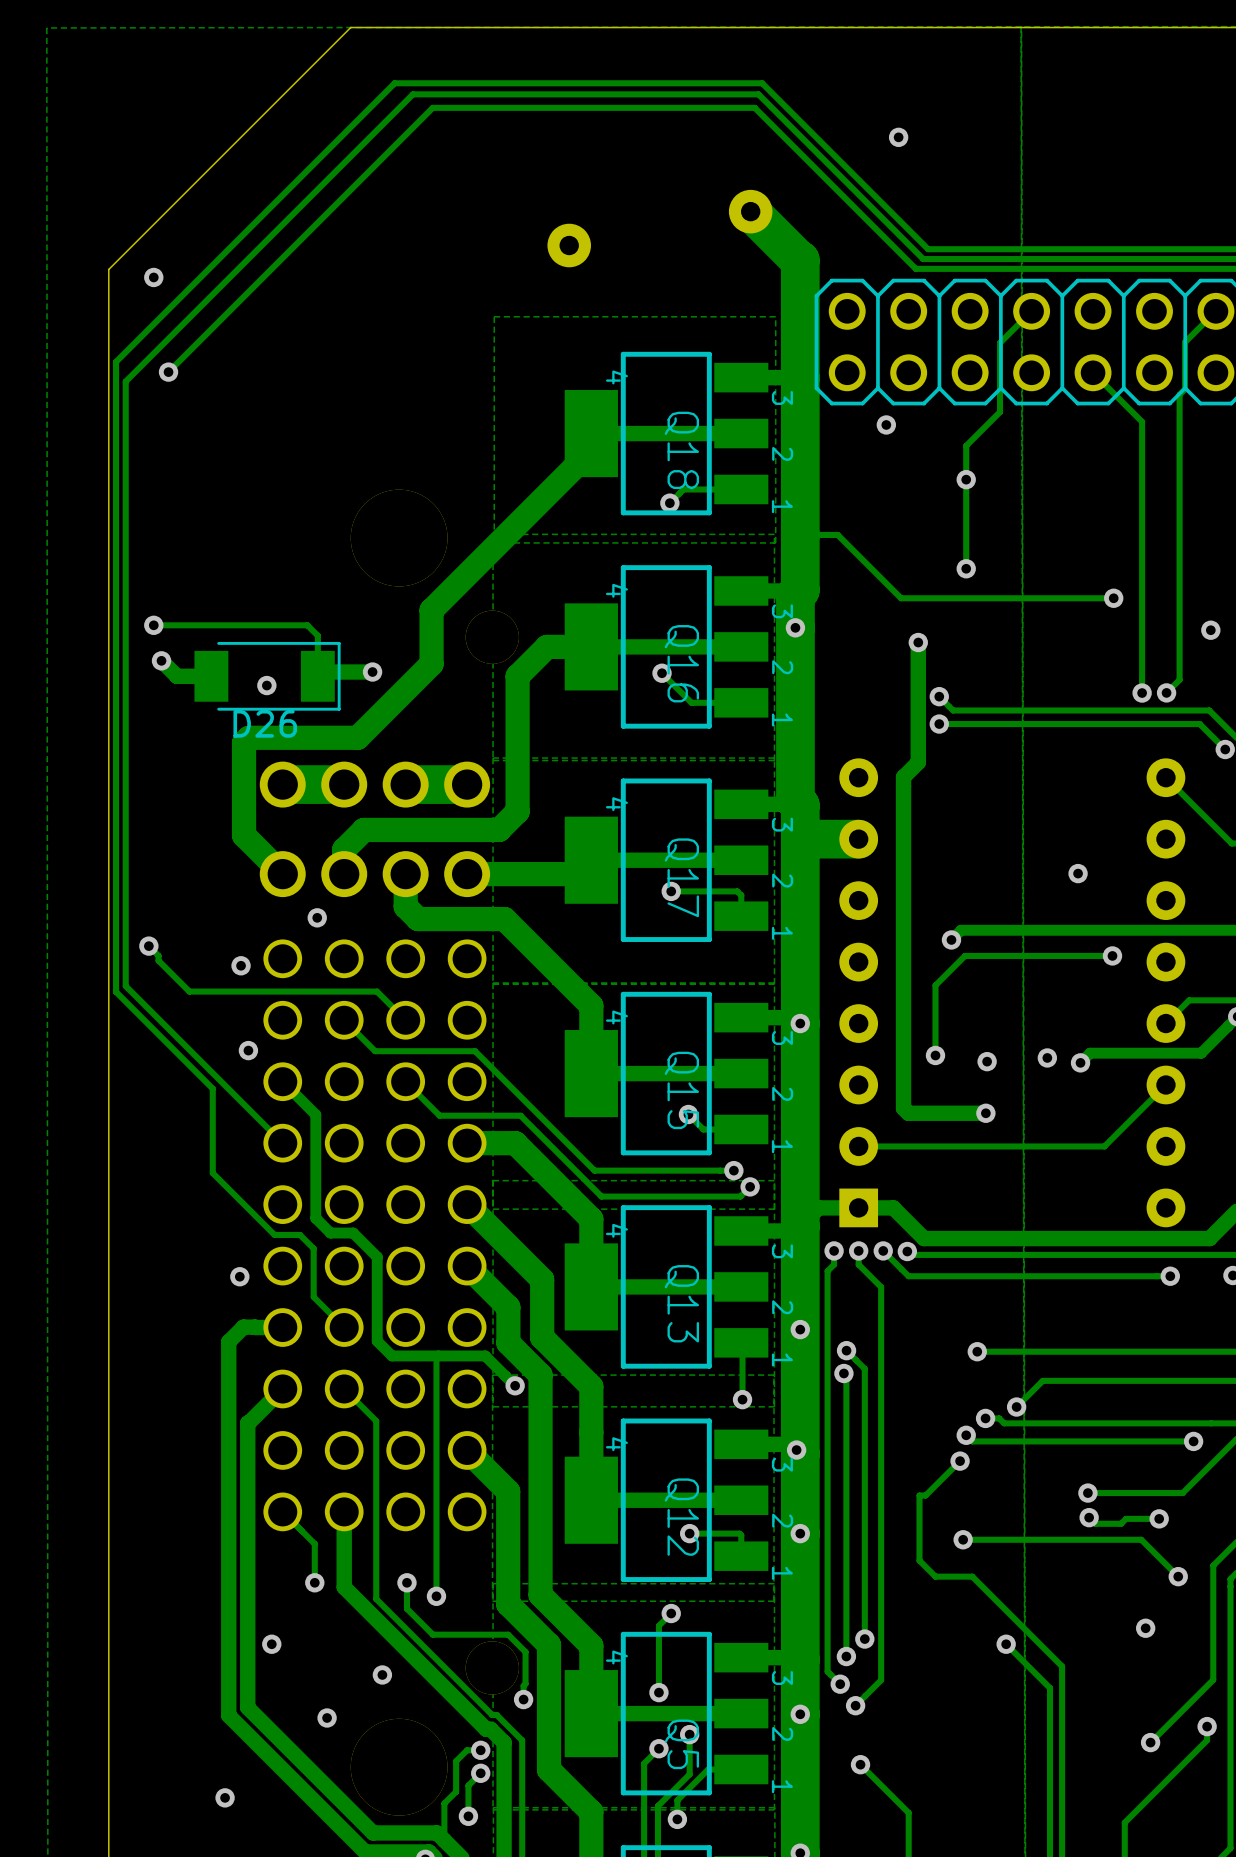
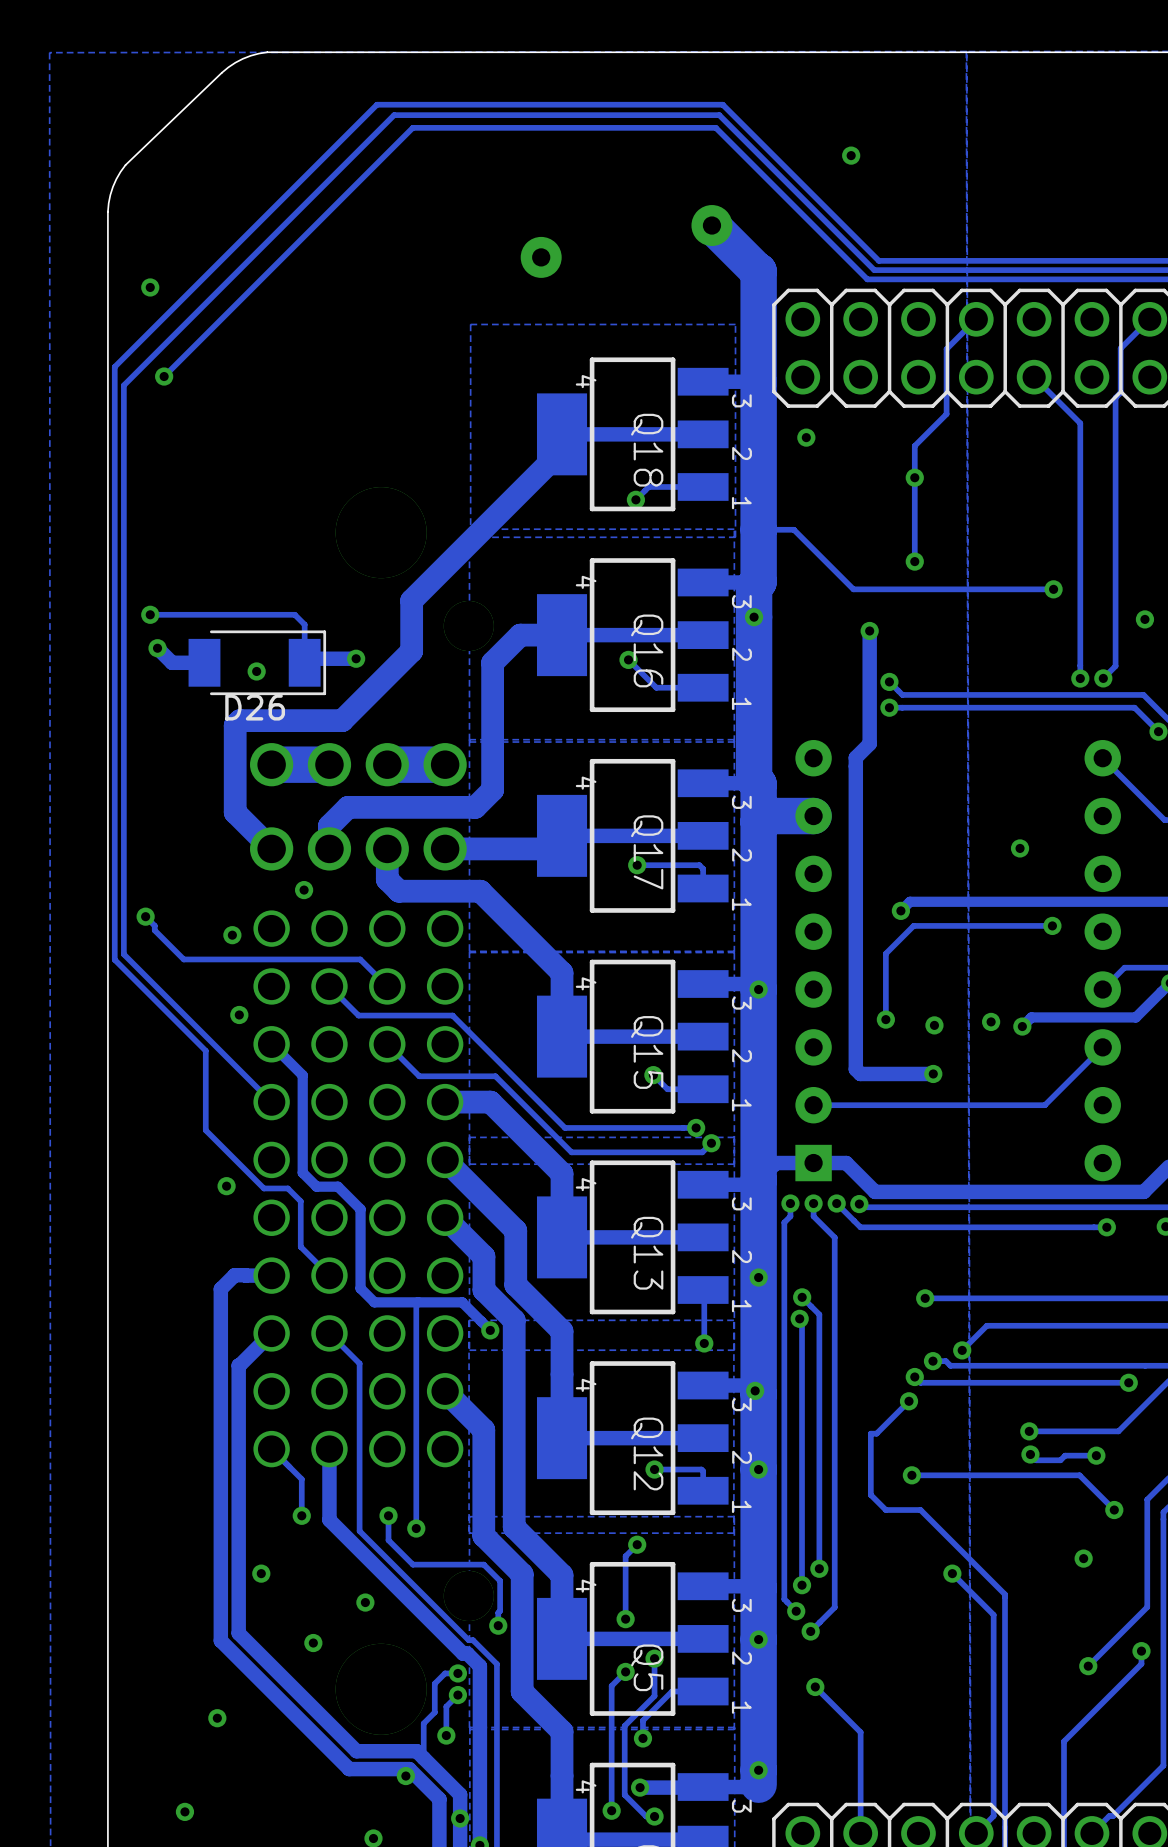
board edge: (350, 27) (108, 269) -> (335, 52) (267, 52) (250, 55) (235, 62) (221, 72) (125, 165) (112, 186) (108, 203) (107, 279)
via position: (886, 424) -> (806, 437)
via position: (239, 1276) -> (226, 1186)

